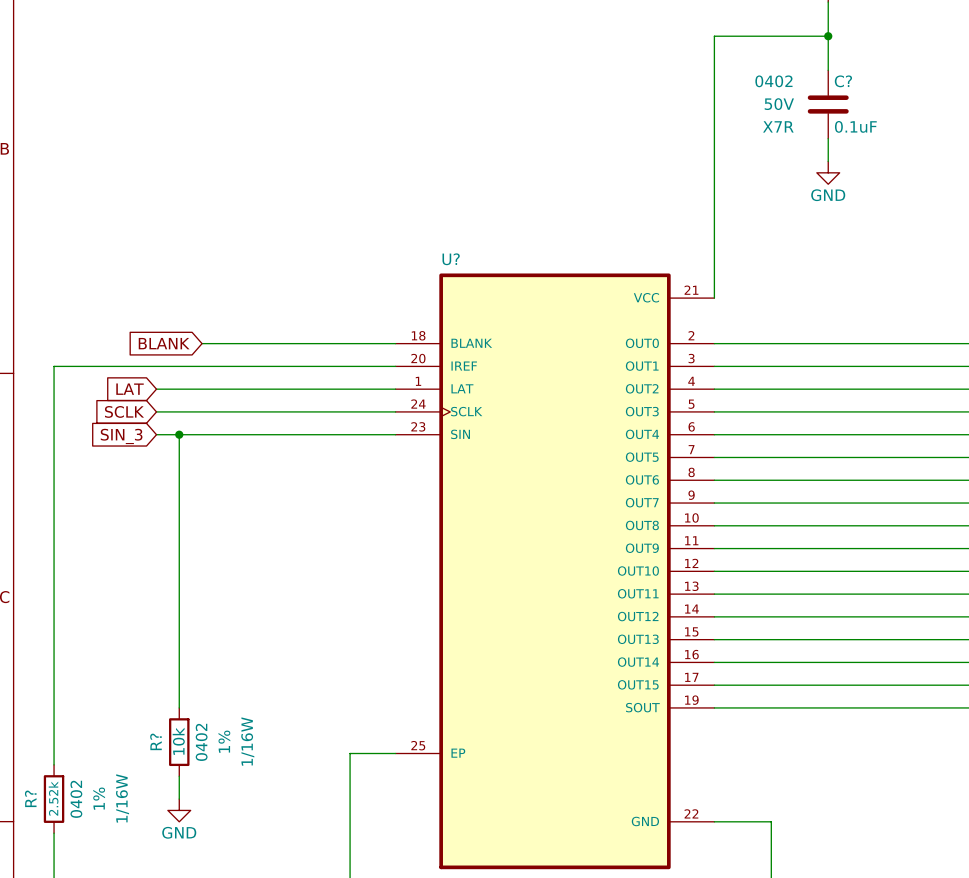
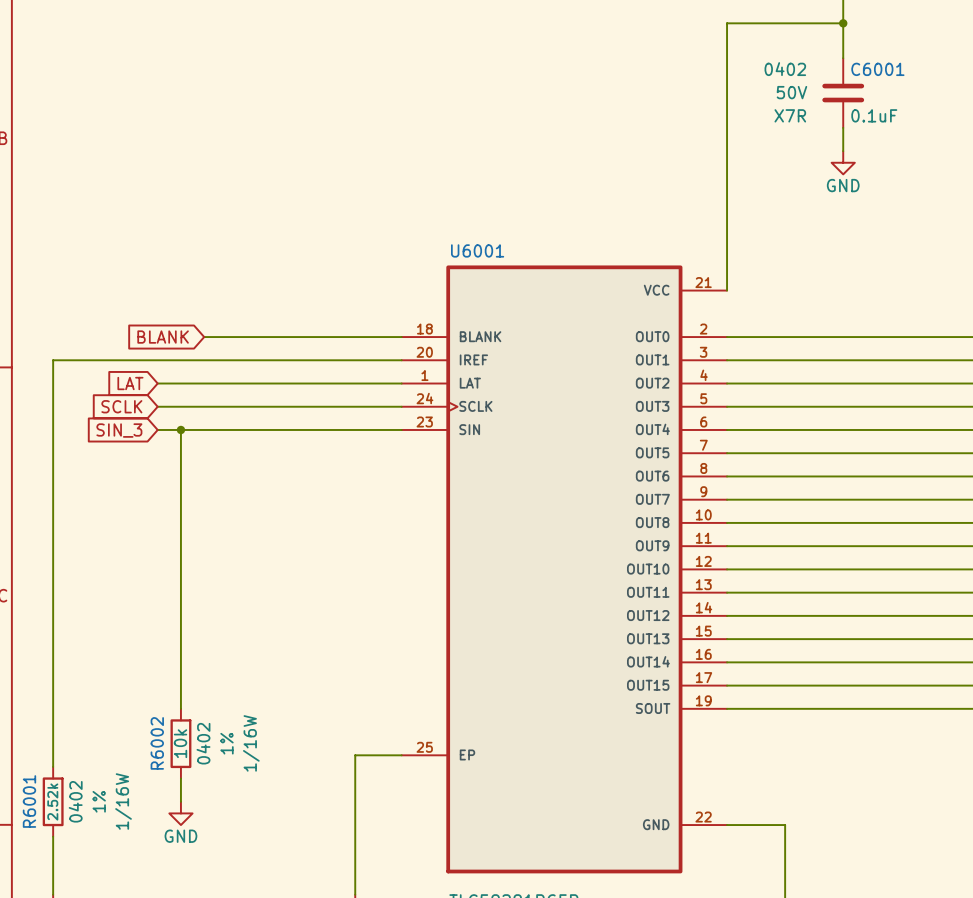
C? name: C? (843, 81) -> C6001 (877, 69)
U? name: U? (451, 259) -> U6001 (477, 250)
R? name: R? (155, 741) -> R6002 (157, 743)
R? name: R? (30, 798) -> R6001 (29, 801)

